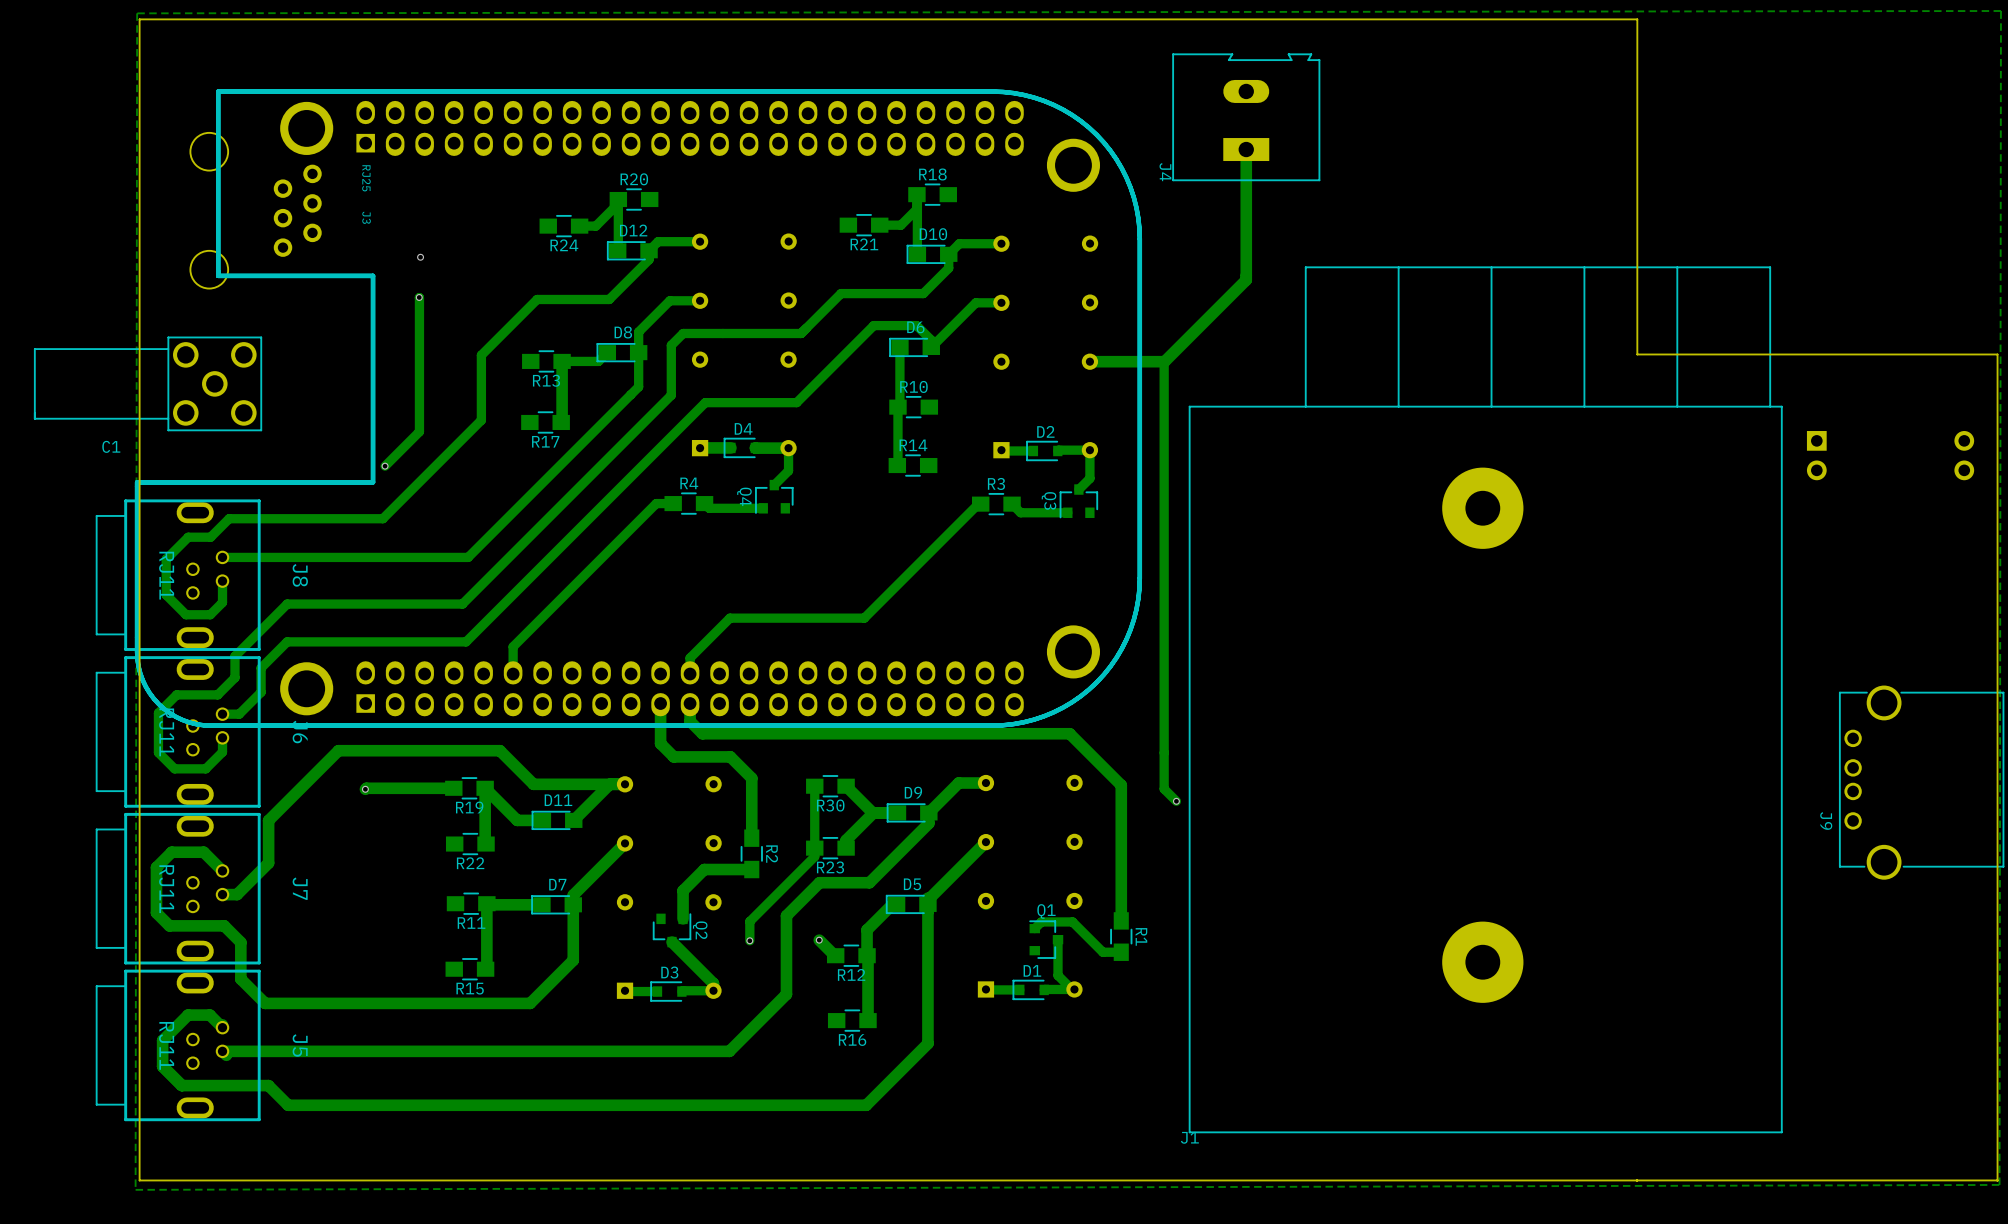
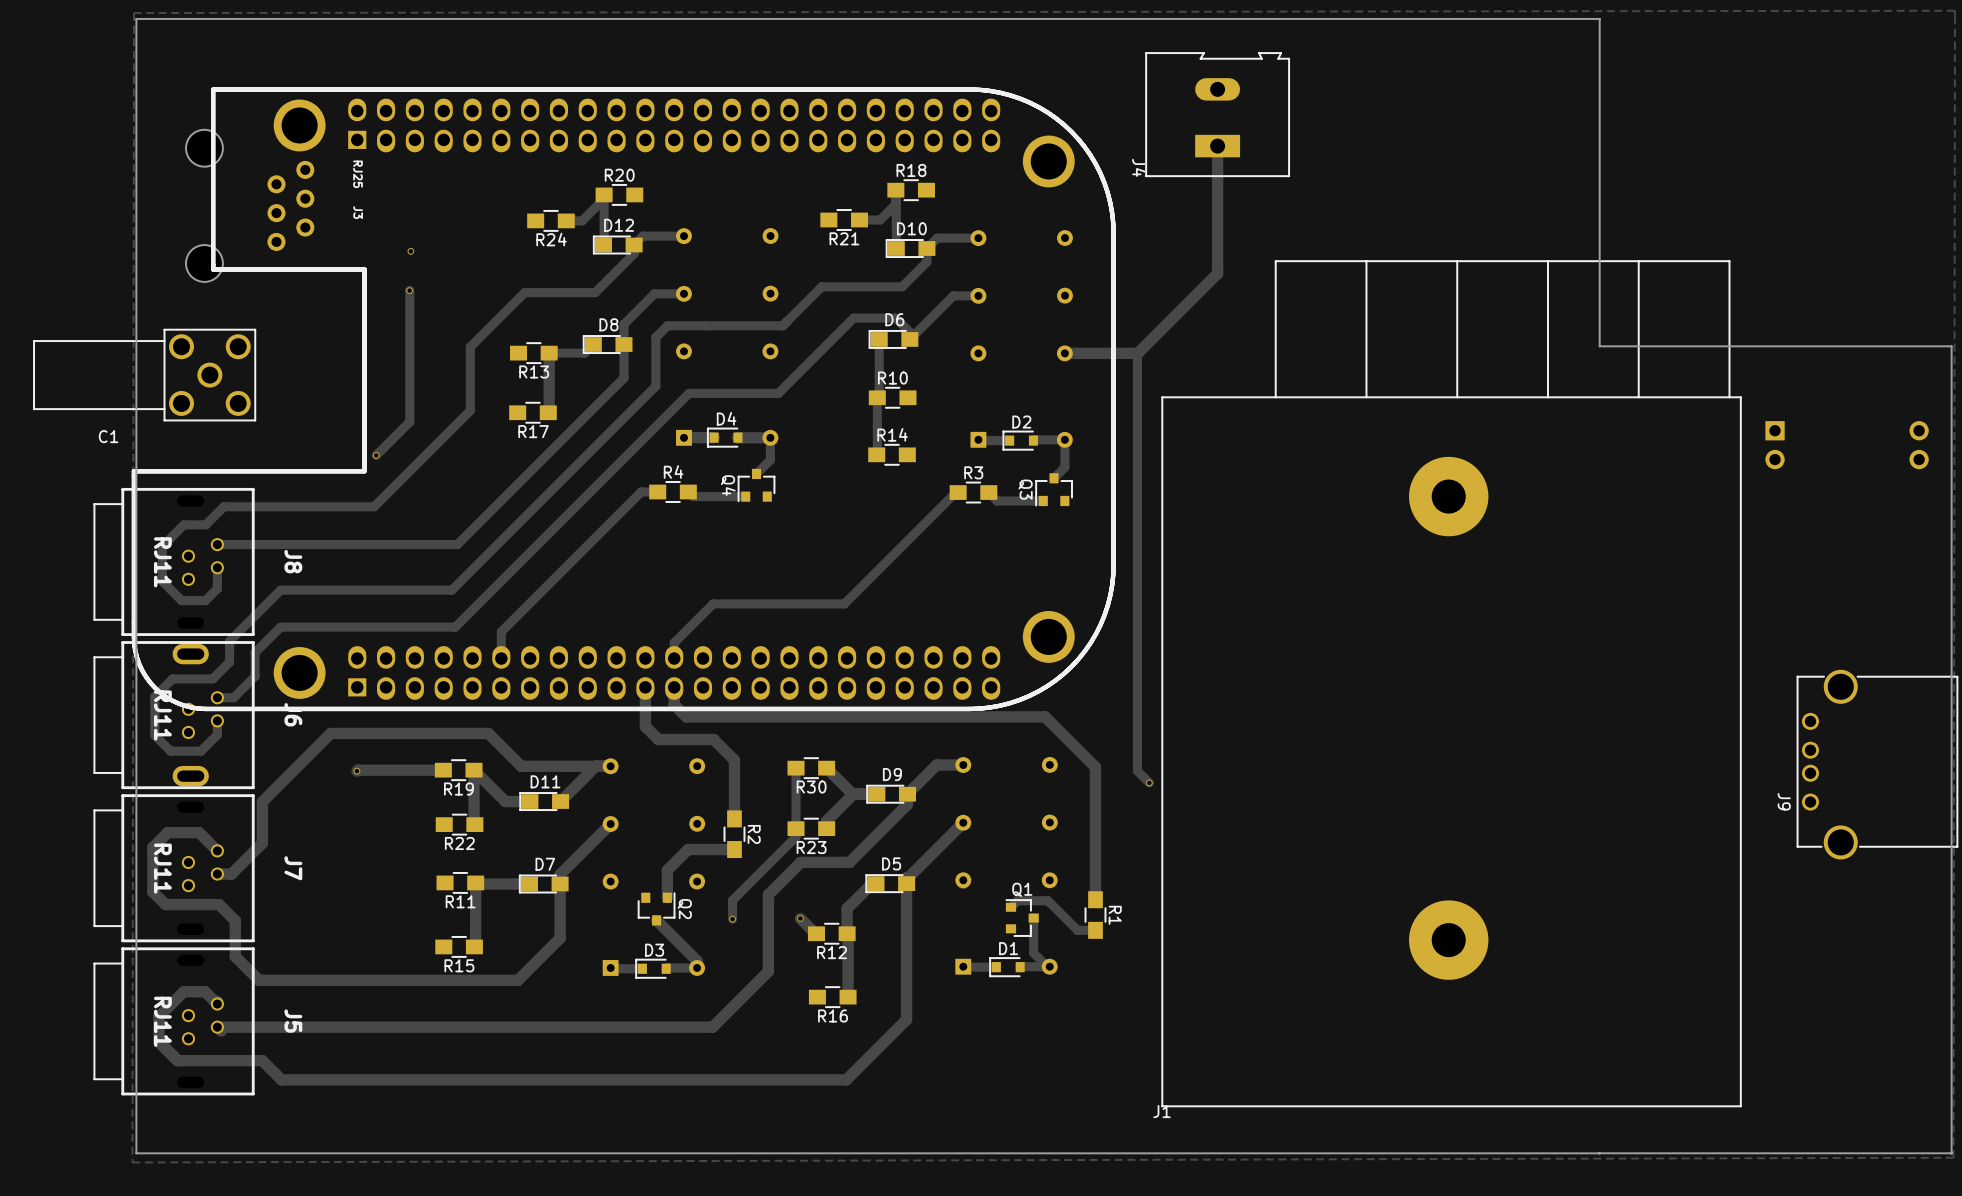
J8 footprint: [95, 499, 261, 651] -> [93, 487, 255, 636]
J7 footprint: [95, 812, 261, 965] -> [93, 794, 255, 943]
J5 footprint: [95, 969, 261, 1122] -> [93, 947, 255, 1096]

